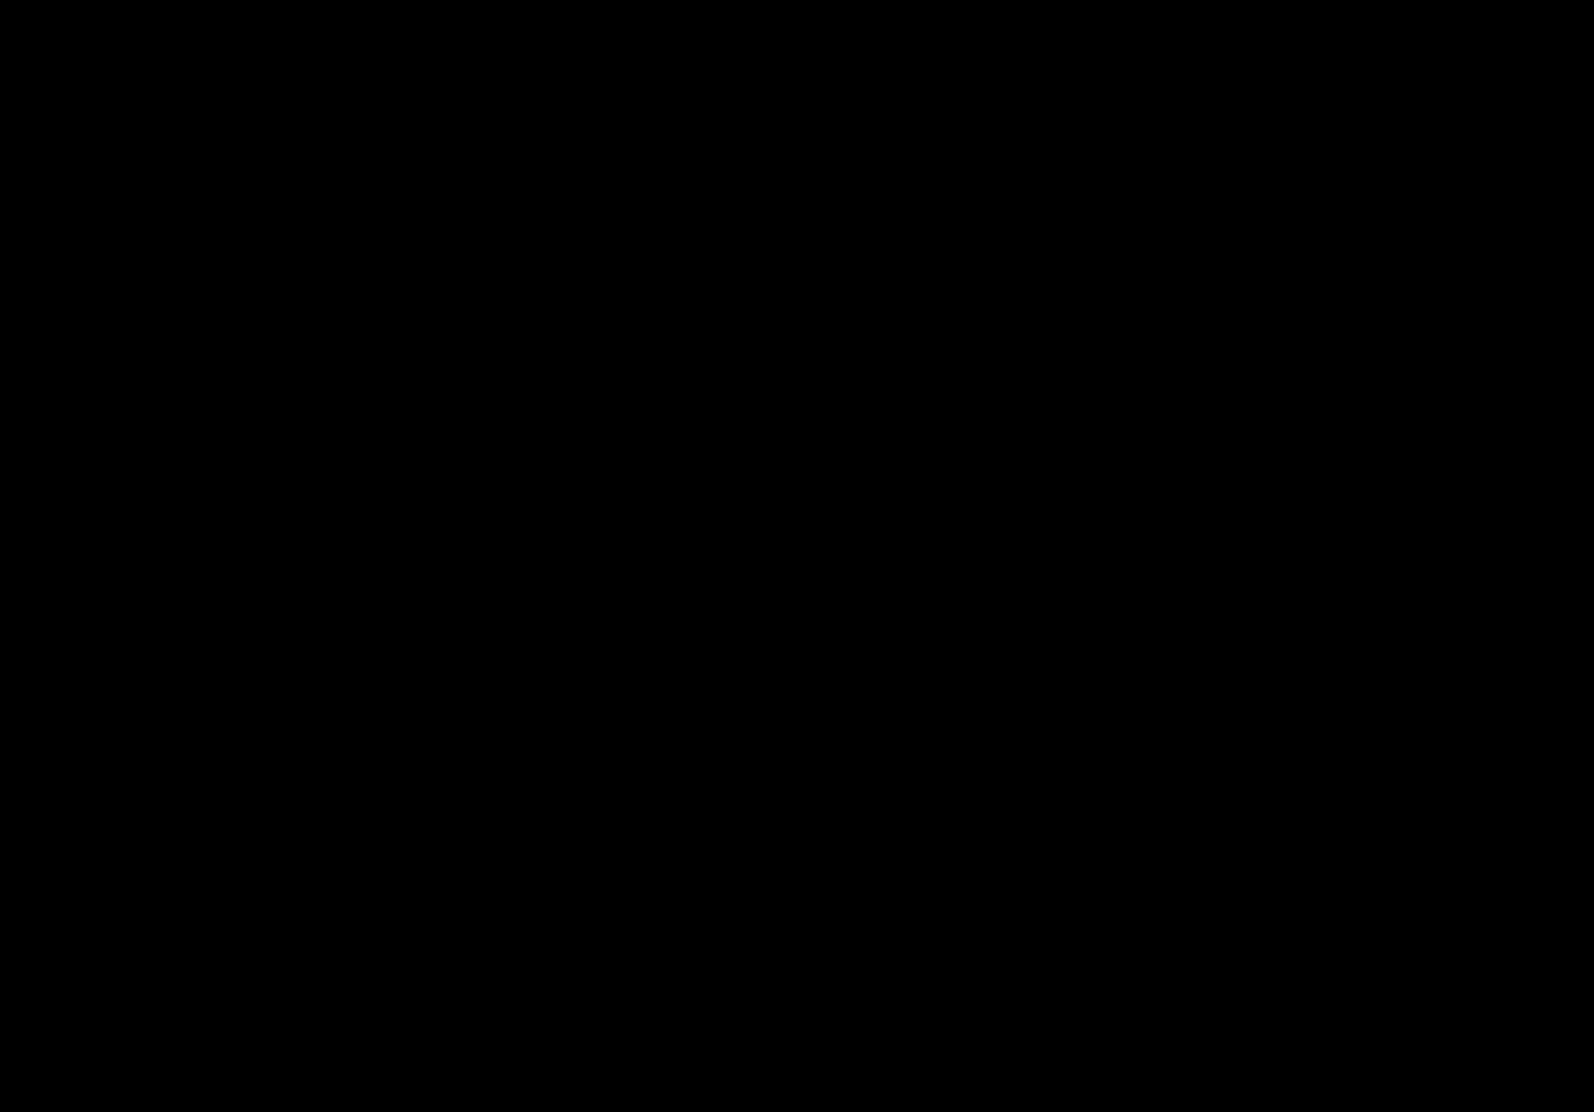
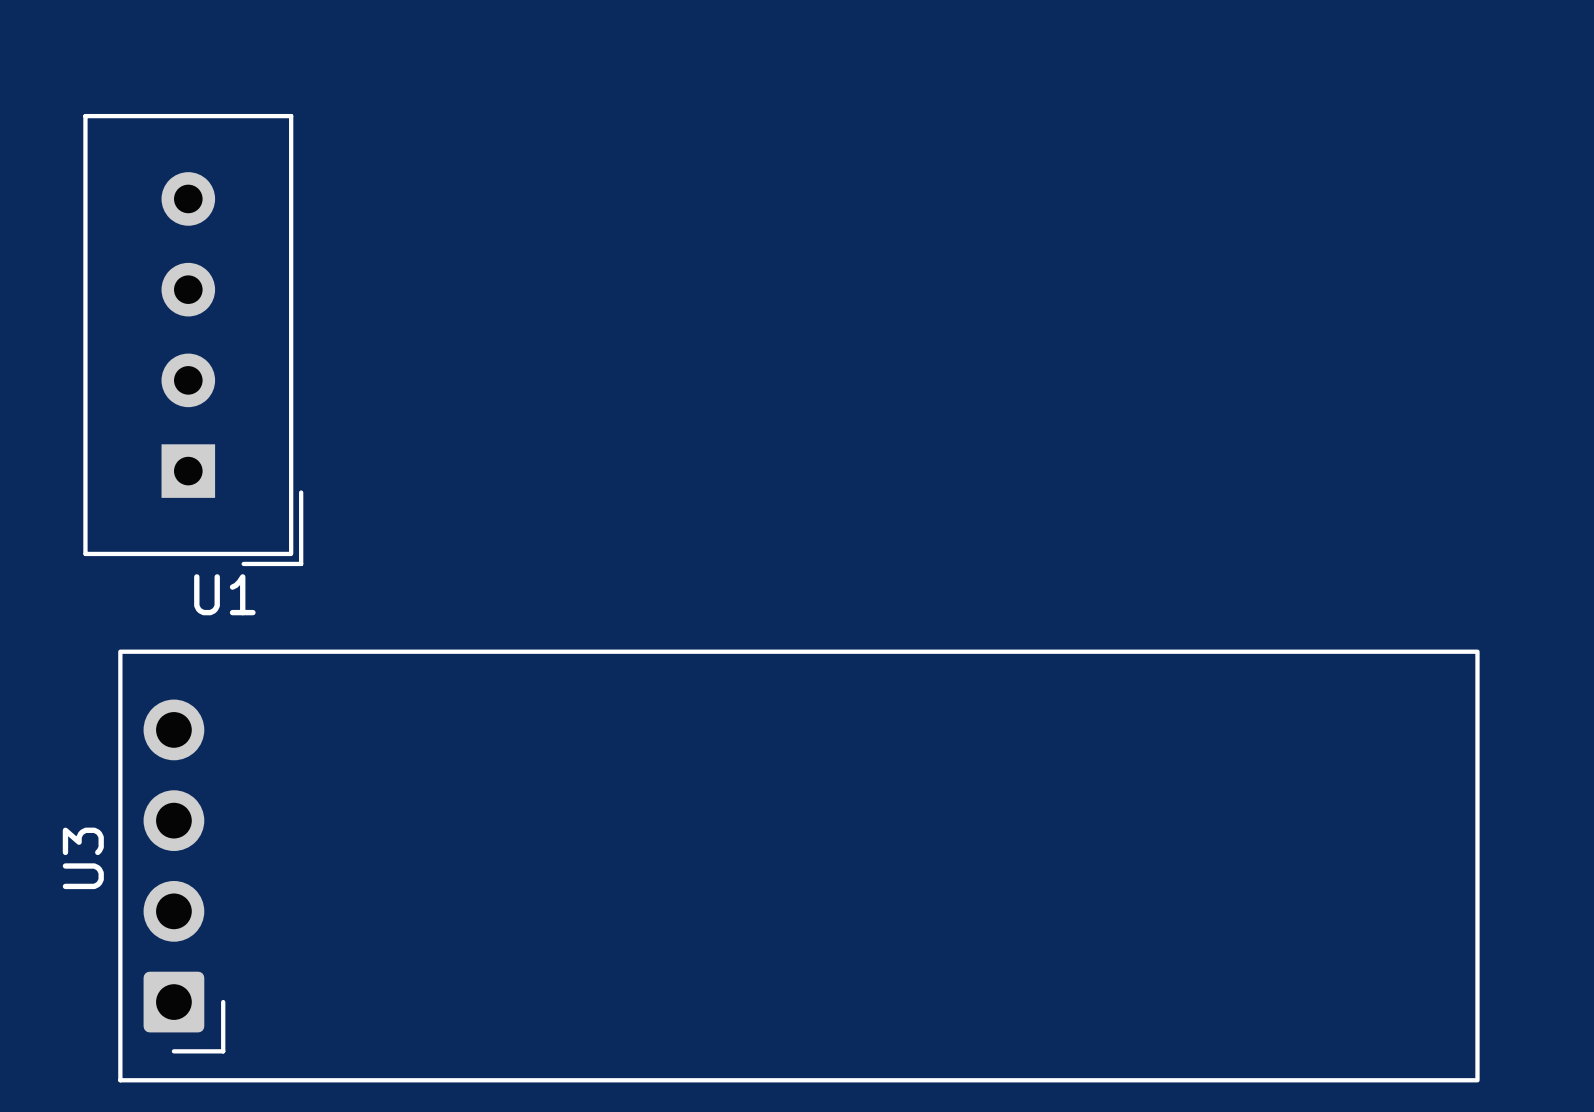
U1: none -> (193, 340)
U3: none -> (798, 865)

